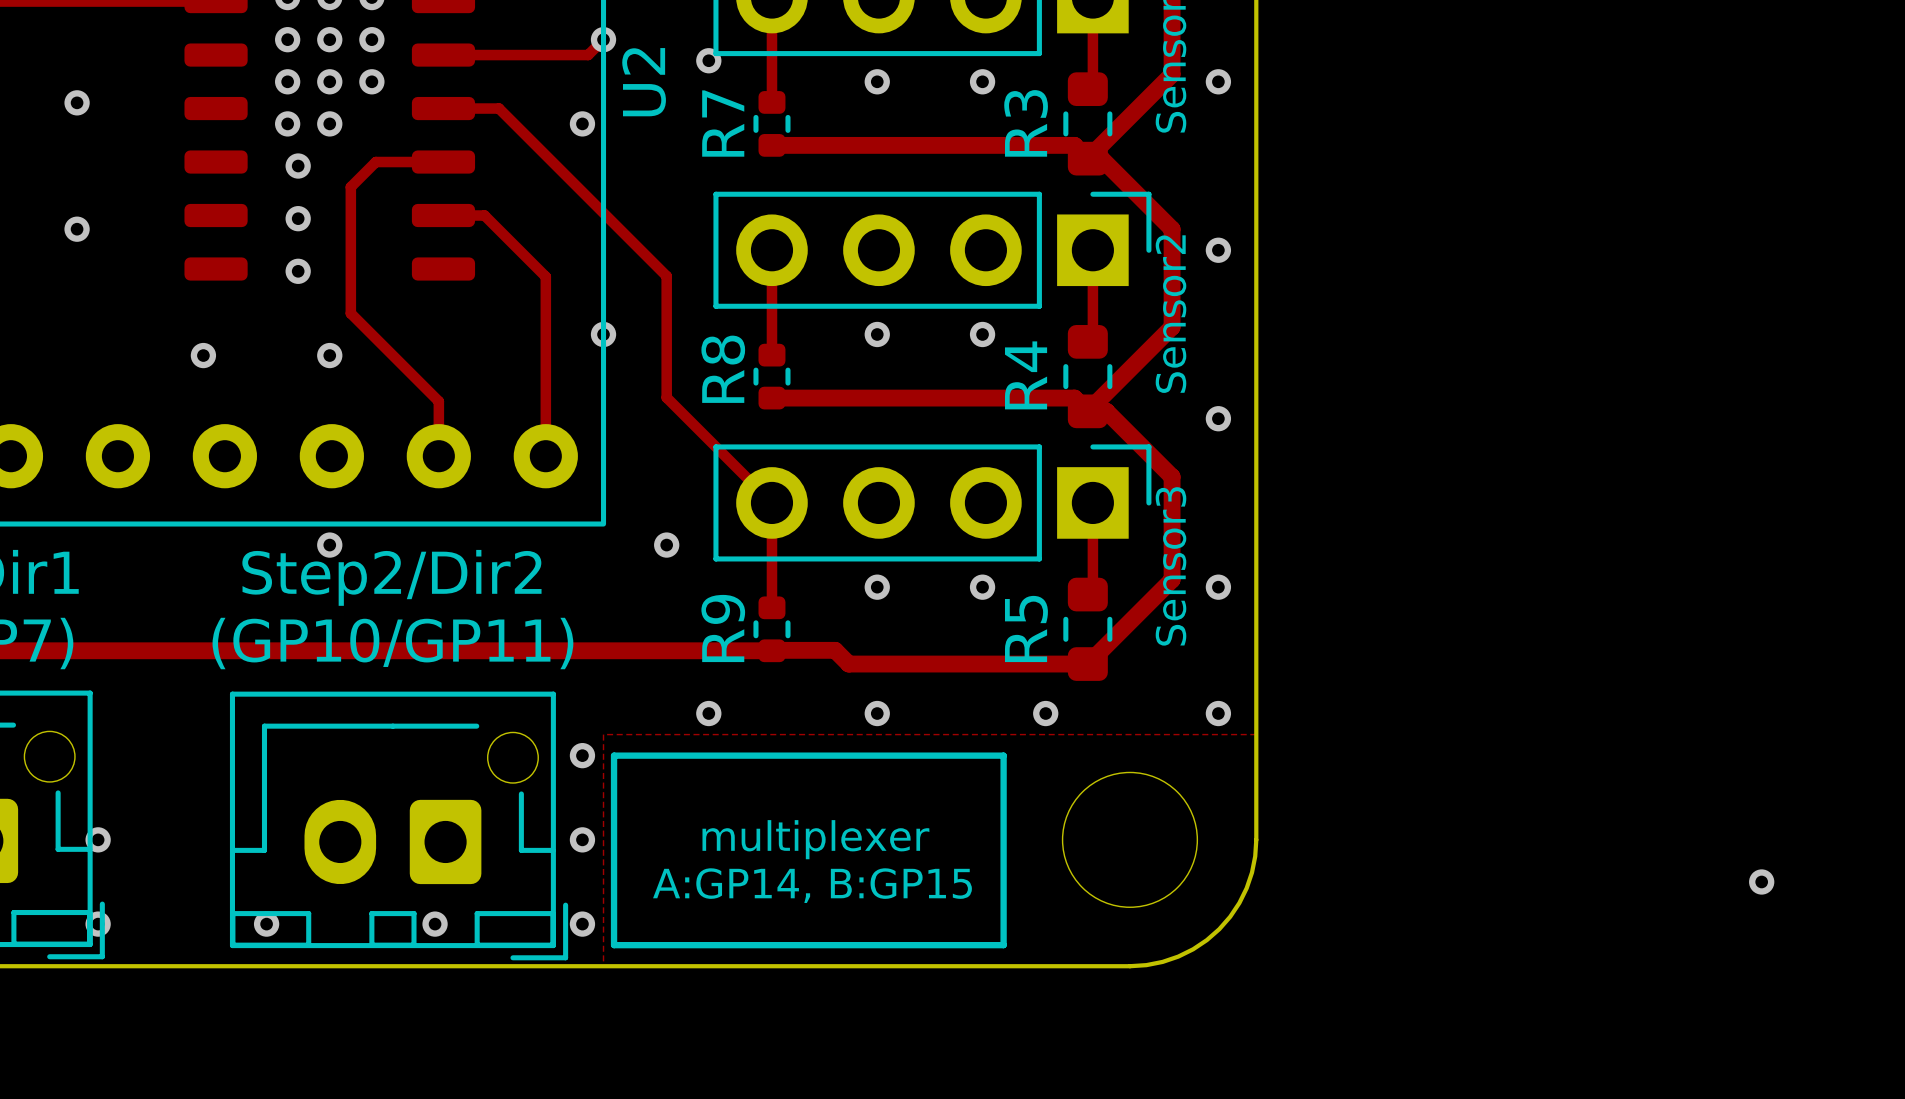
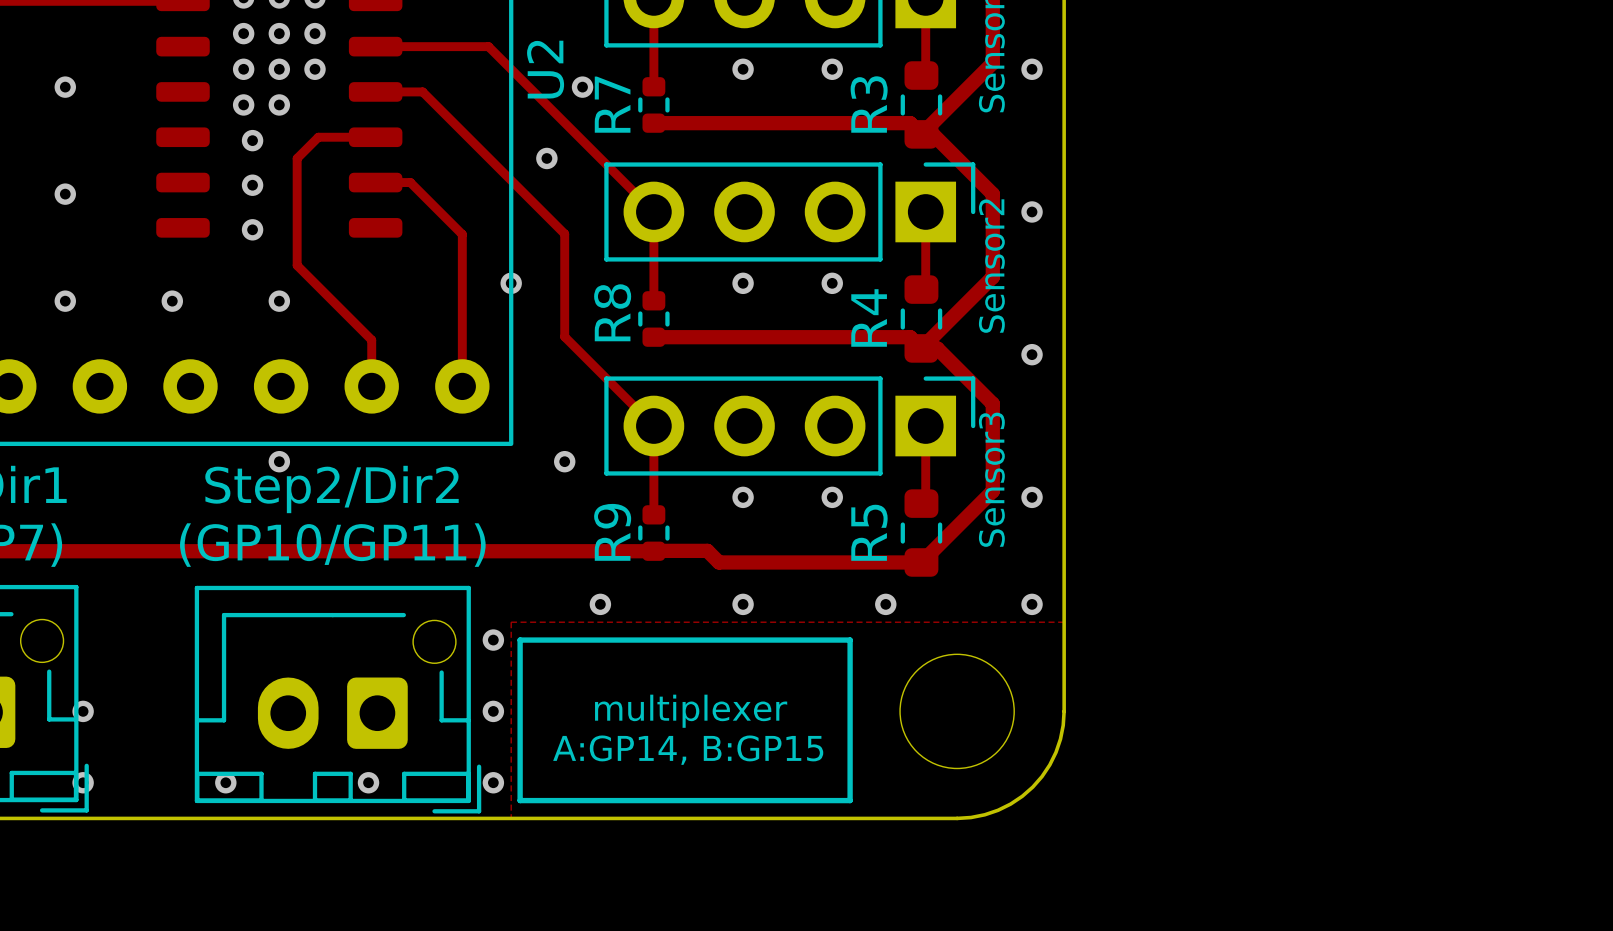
track: (603, 39) (588, 55) (576, 55) -> (653, 211) (488, 46)
via: (603, 39) -> none
via position: (708, 60) -> (582, 87)
via: (582, 123) -> none
via: none -> (546, 158)
via: none -> (65, 301)
via: (1761, 881) -> none

